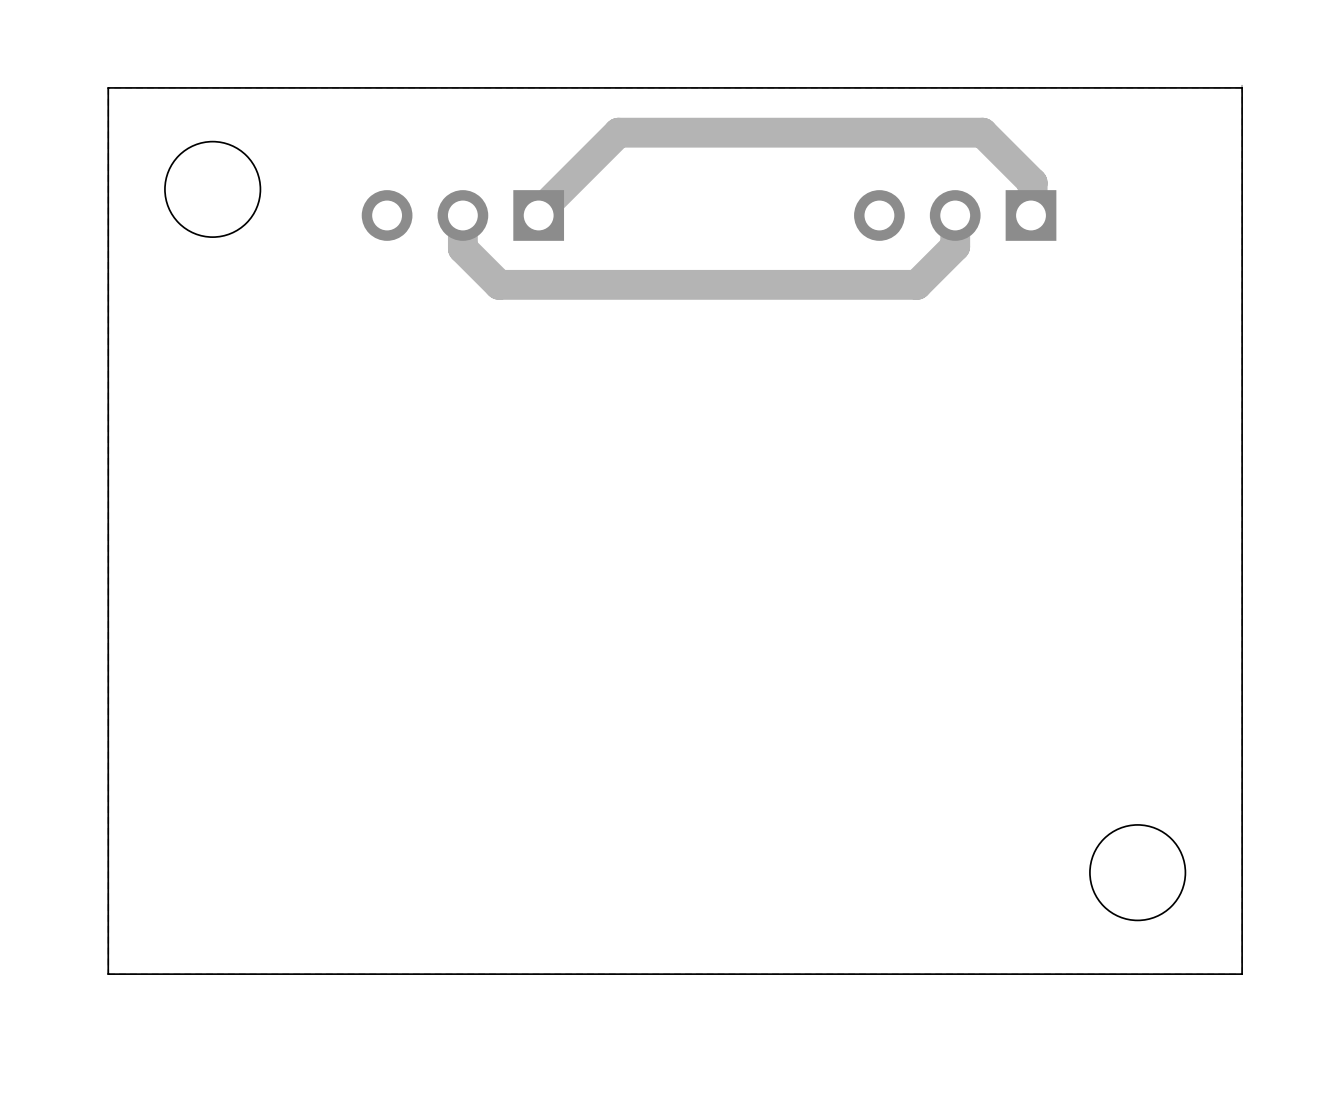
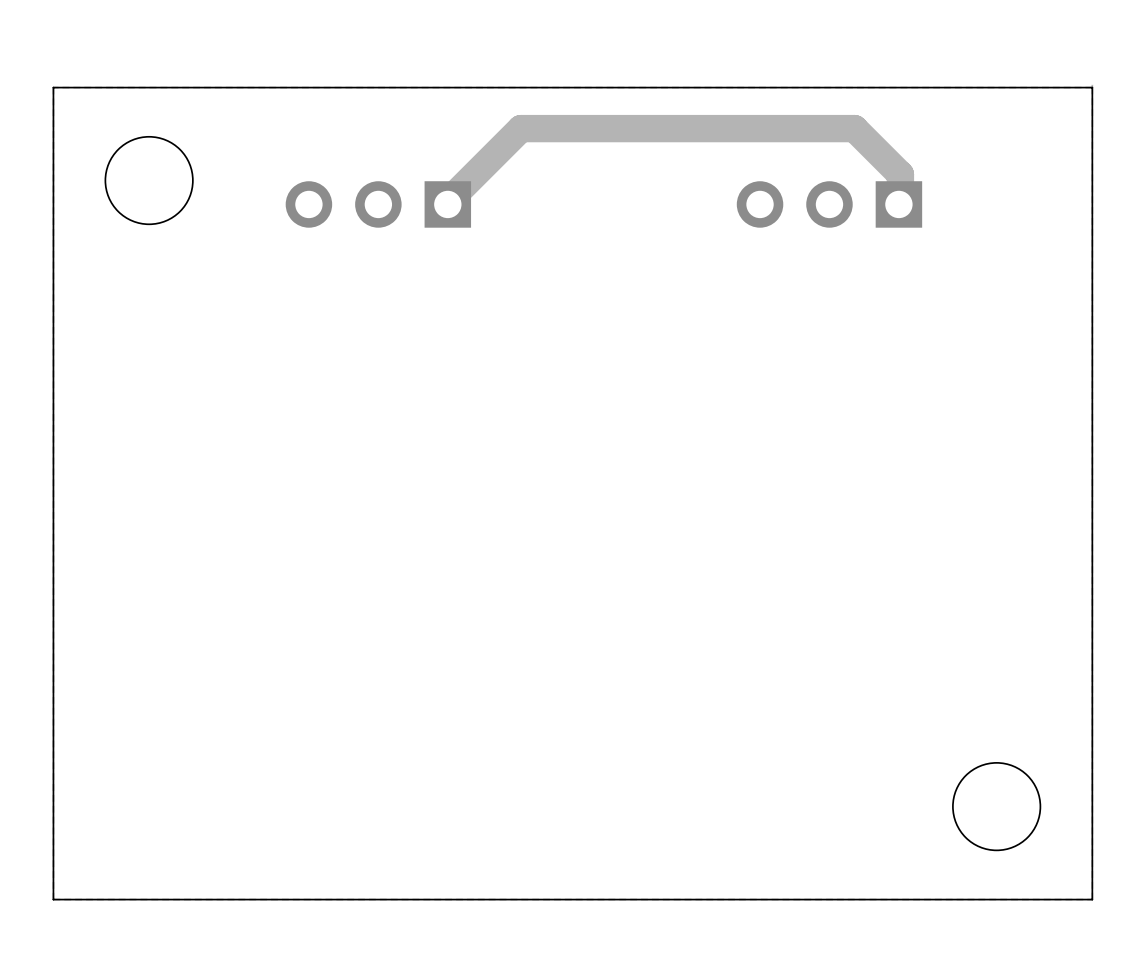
track: (955, 215) (955, 246) (916, 284) (499, 284) (462, 248) (462, 215) -> none

